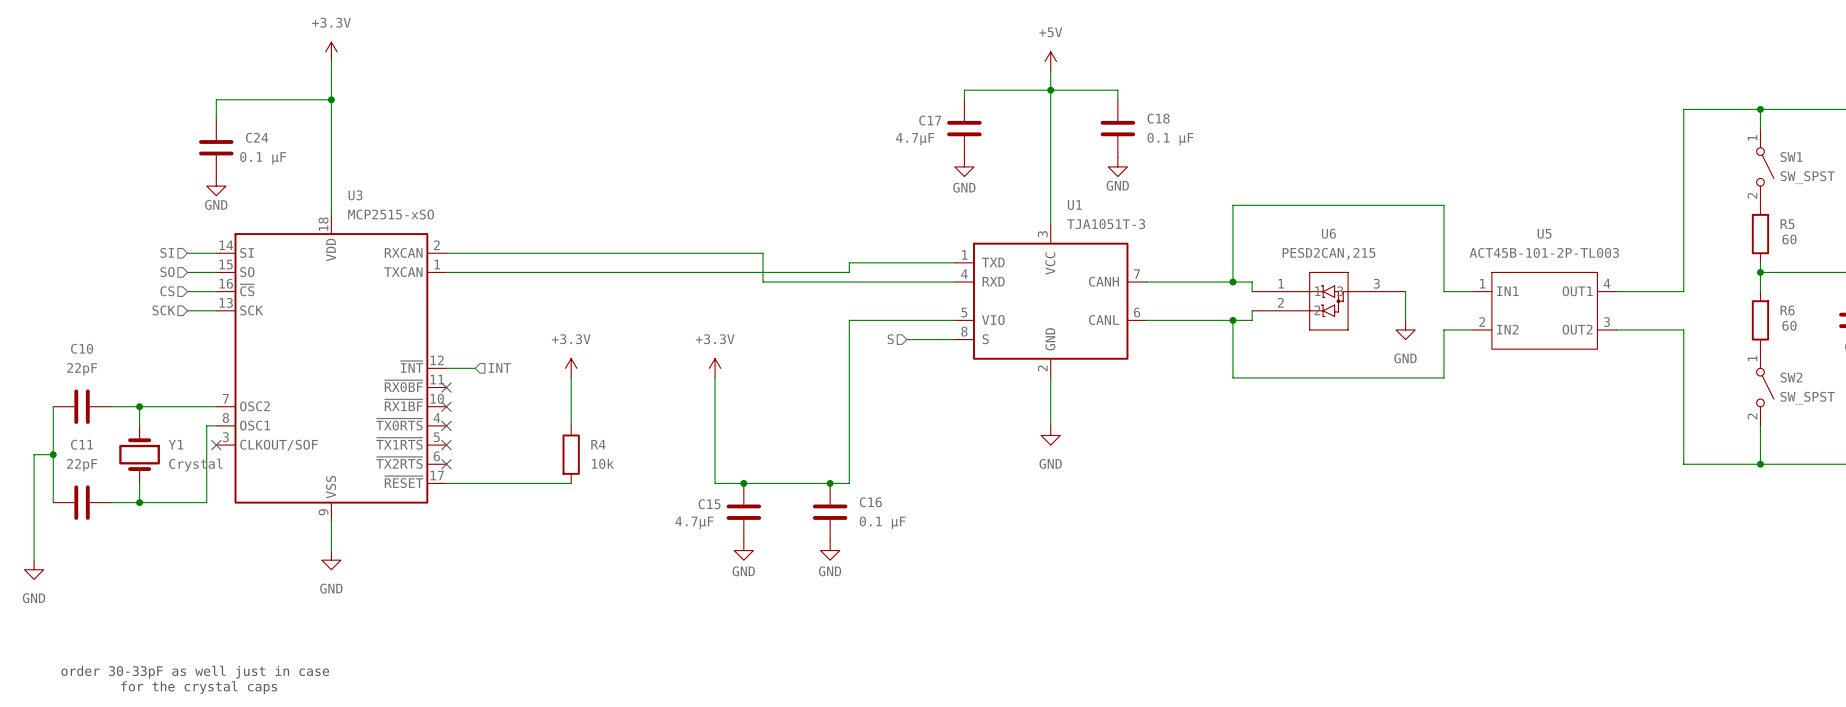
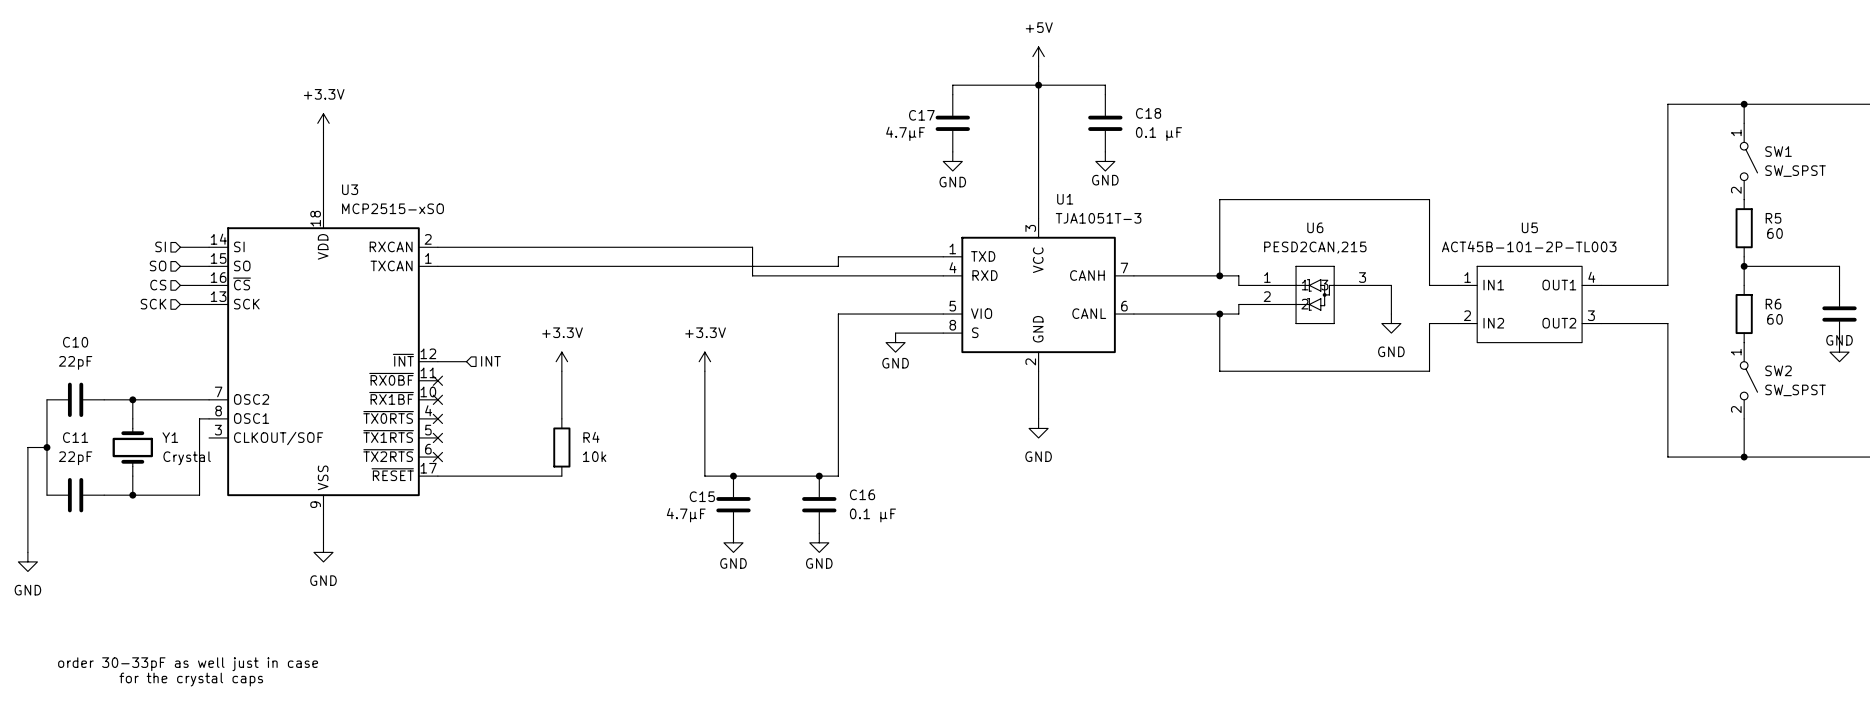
power symbol position: +3.3V (331, 51) -> +3.3V (323, 123)
wire: (331, 61) (331, 138) -> none
wire: (331, 99) (216, 99) (216, 118) -> none
junction: (331, 99) -> none
C24: 0.1 µF (216, 147) -> none
power symbol: GND (216, 186) -> none
hierarchical label: S (890, 339) -> none
power symbol: none -> GND (895, 342)
no-connect mark: (216, 445) -> none

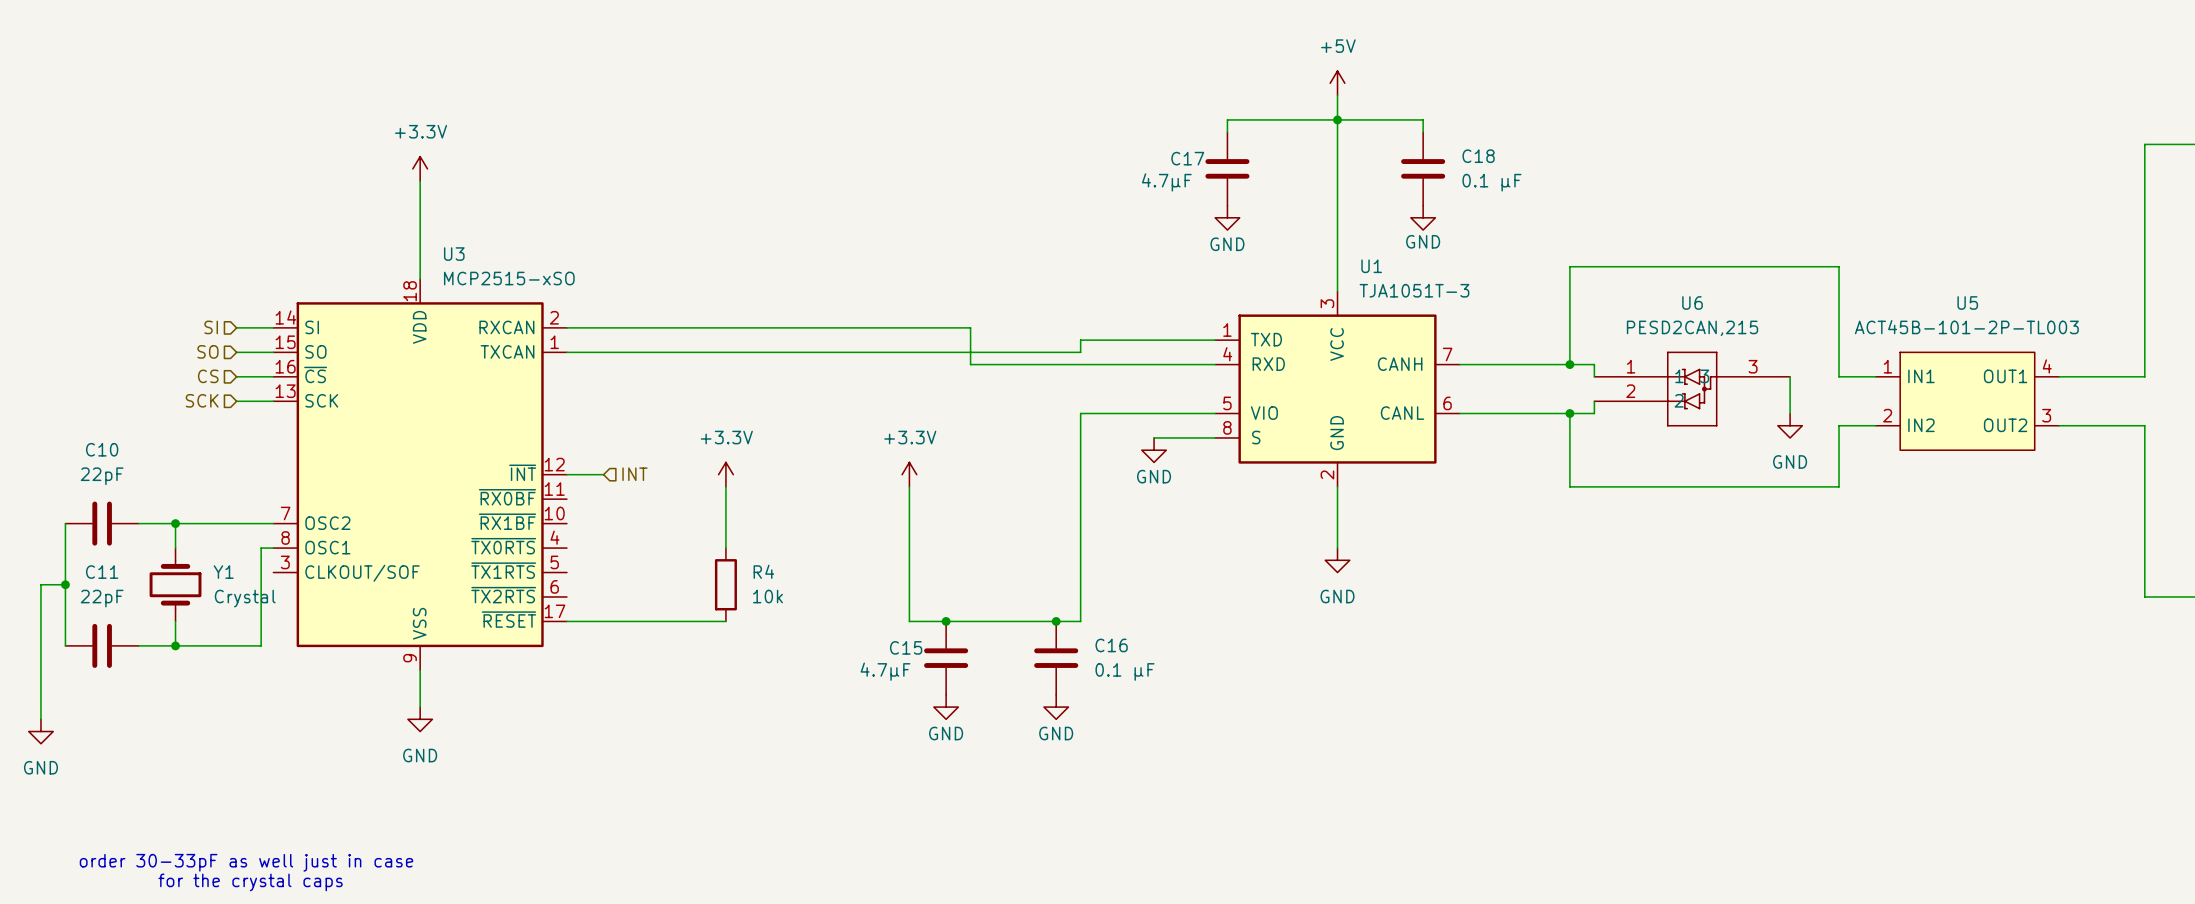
no-connect mark: (437, 380) -> none
no-connect mark: (437, 399) -> none
no-connect mark: (437, 418) -> none
no-connect mark: (437, 437) -> none
no-connect mark: (437, 457) -> none

